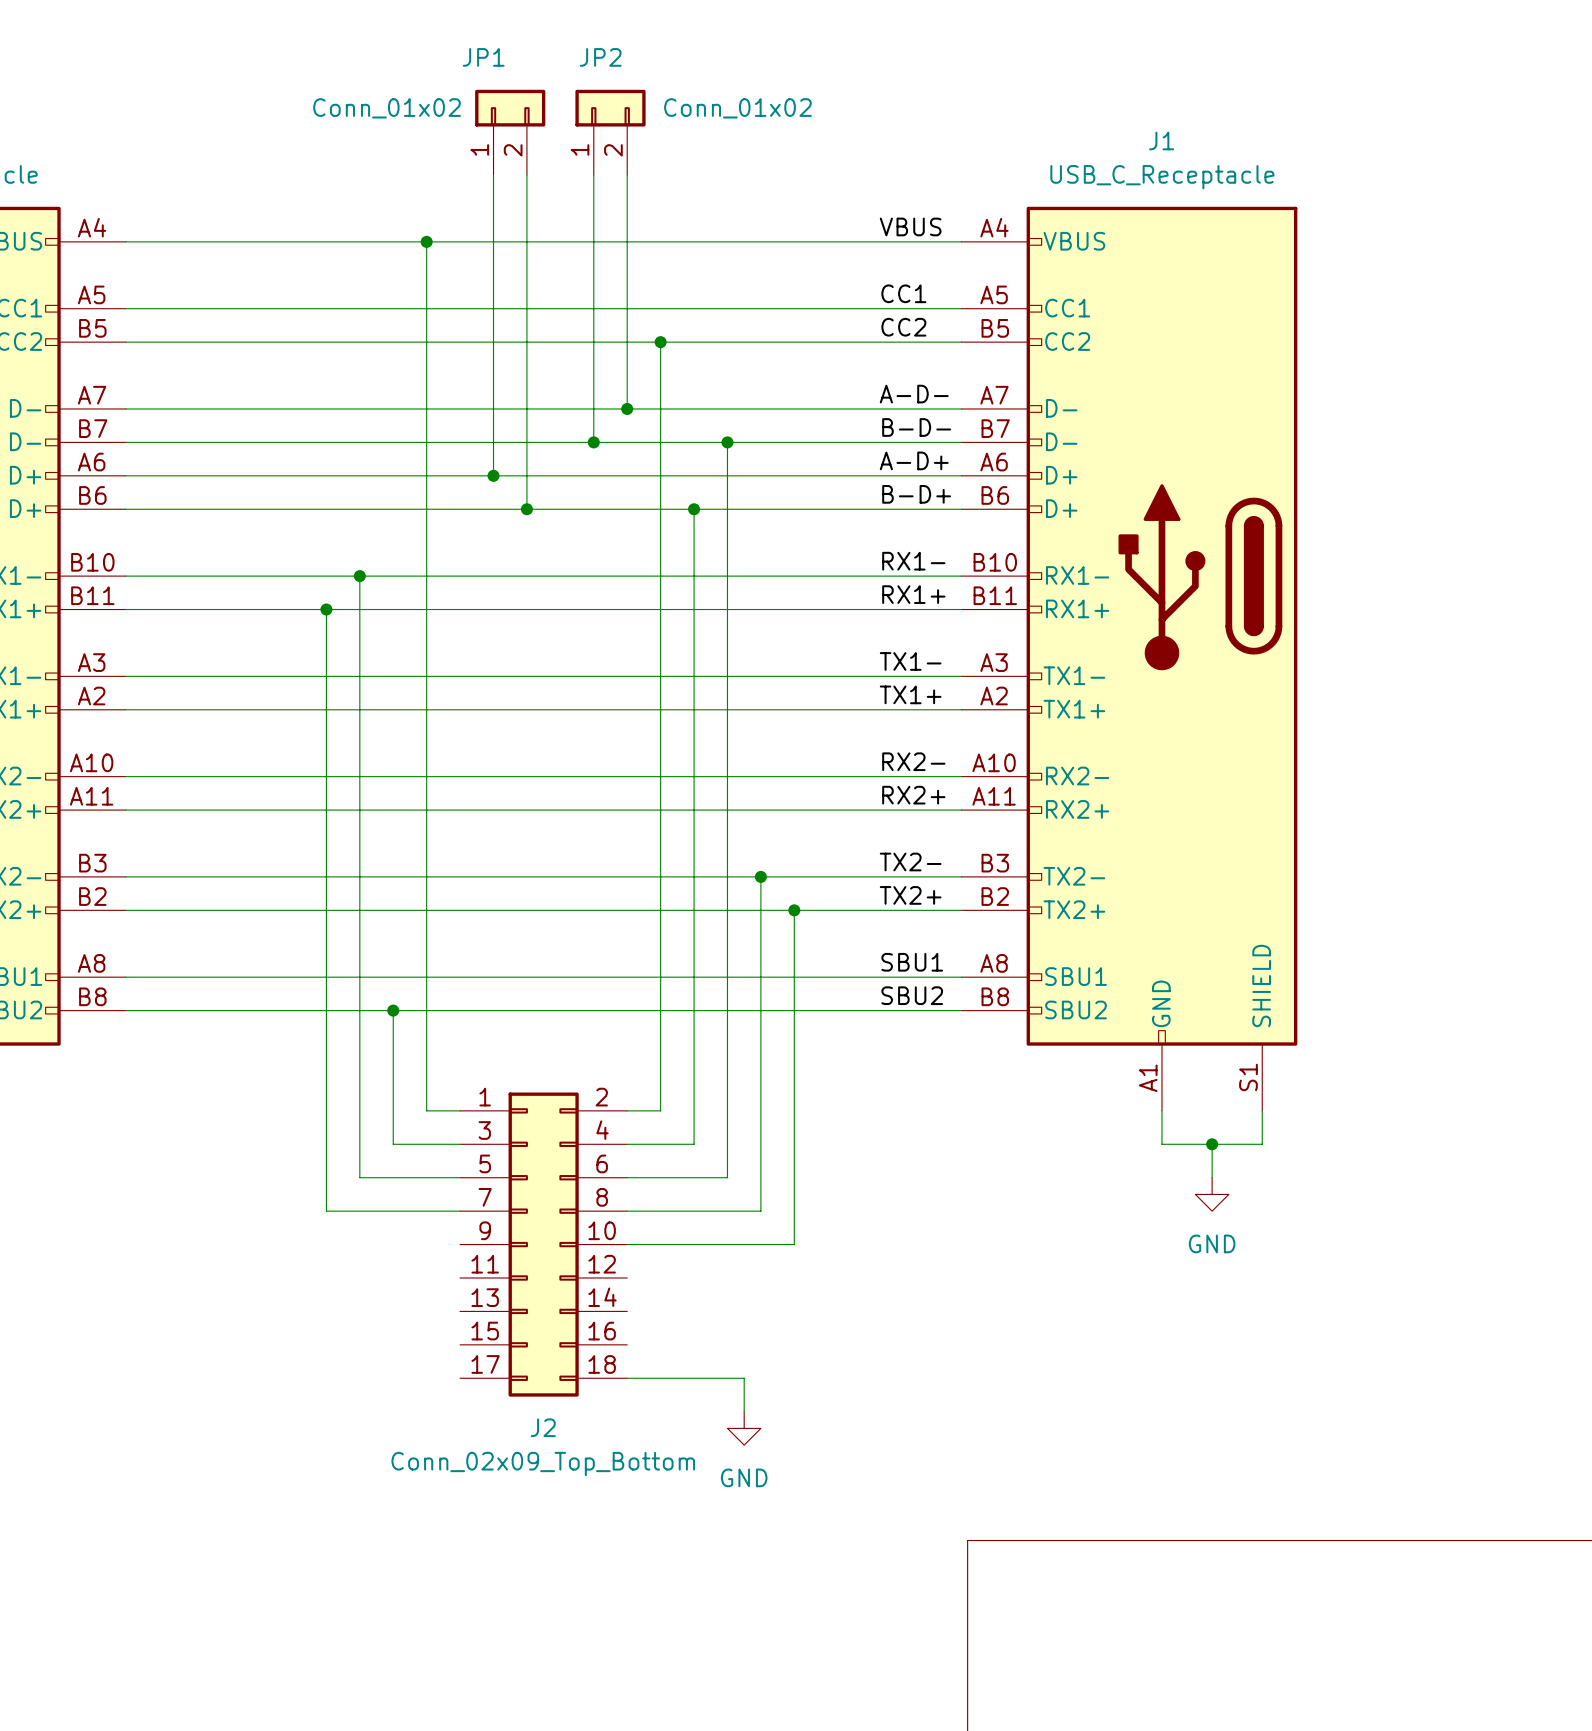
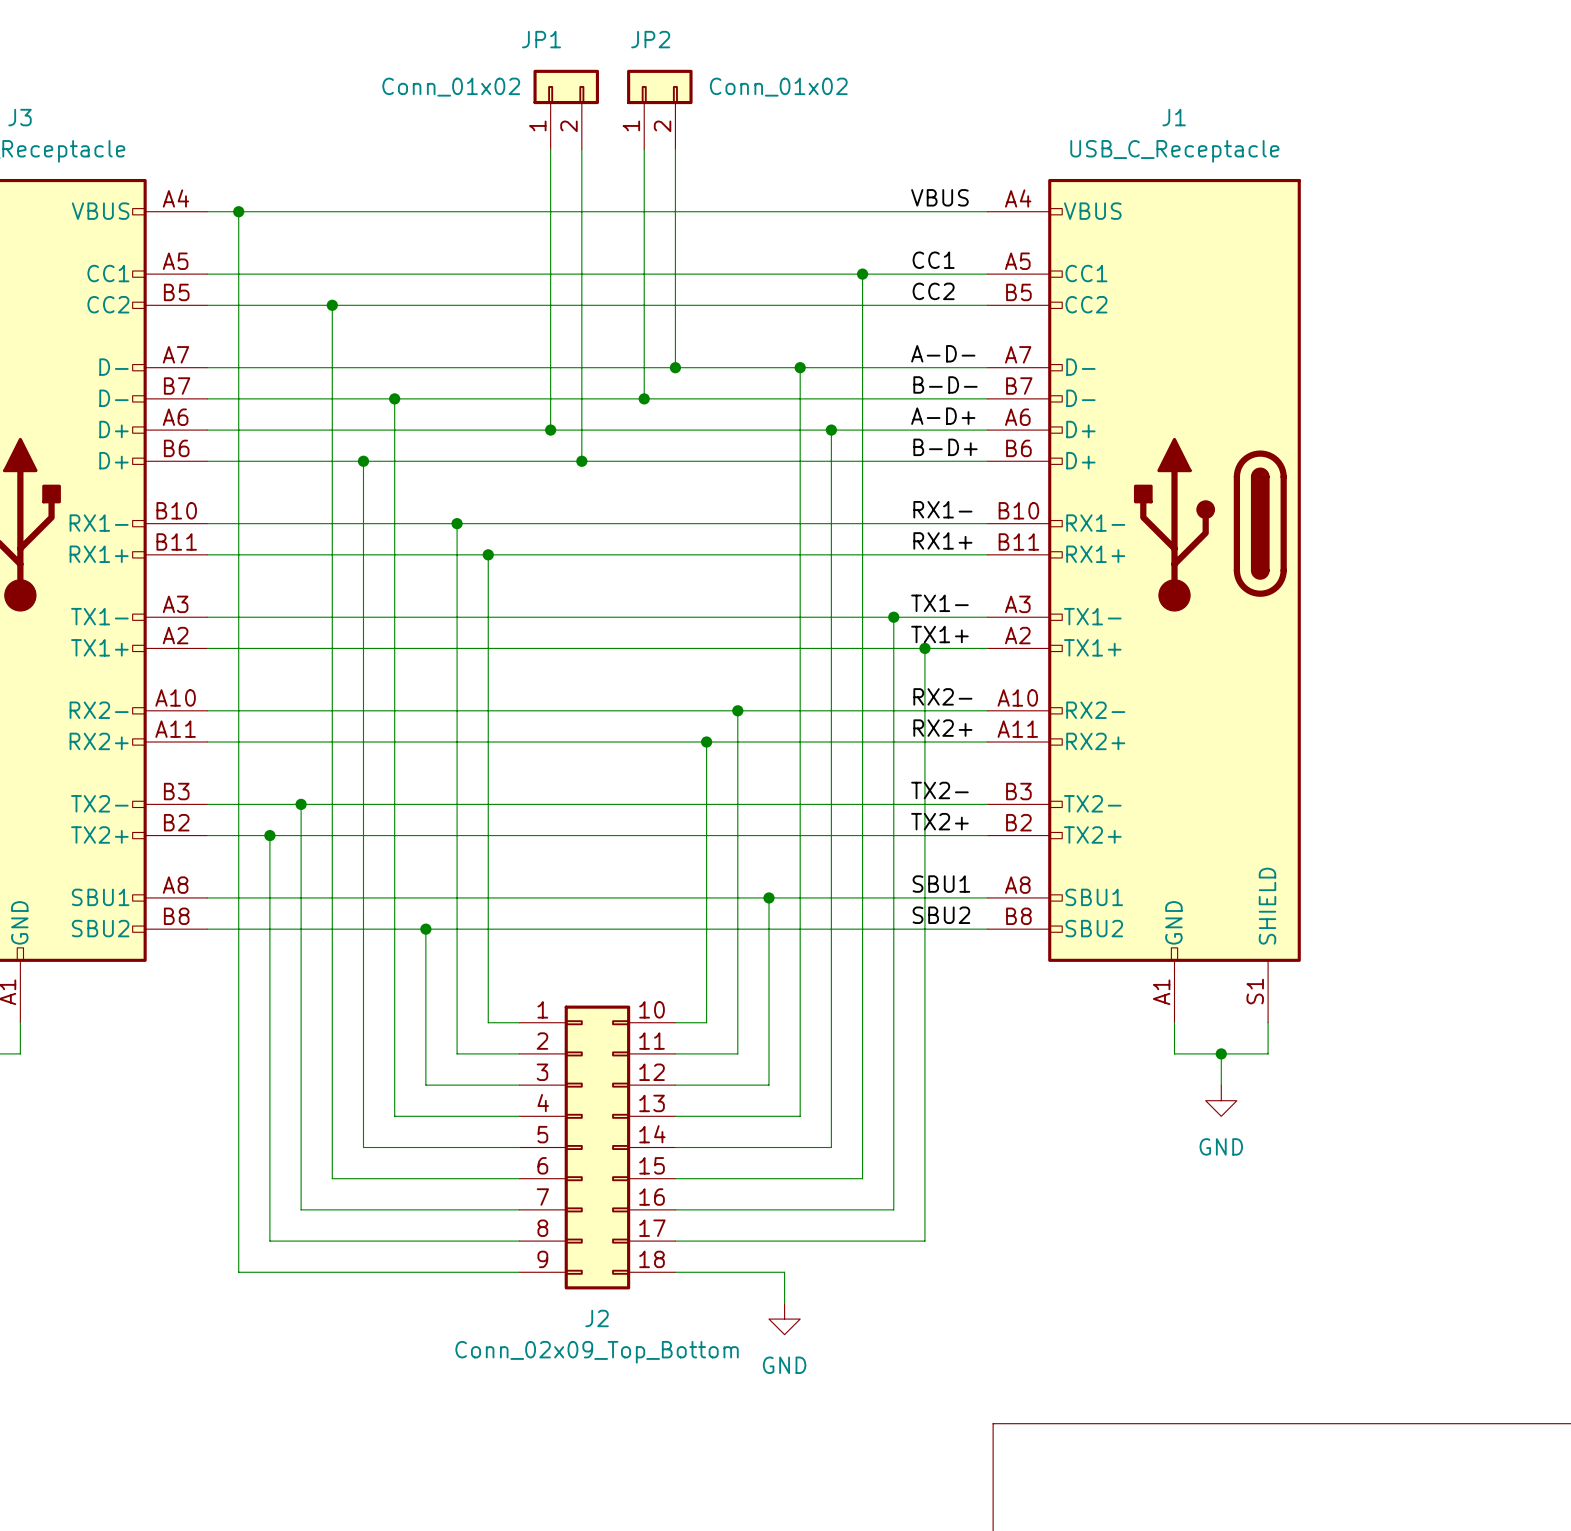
wire: none -> (238, 211) (238, 1272) (519, 1272)
junction: none -> (238, 211)
wire: (426, 241) (426, 609) -> none
junction: (426, 241) -> none
wire: none -> (862, 274) (862, 1178) (675, 1178)
junction: none -> (862, 274)
wire: none -> (332, 305) (332, 1178) (519, 1178)
junction: none -> (332, 305)
wire: (660, 342) (660, 810) -> (800, 367) (800, 804)
junction: (660, 342) -> none
junction: none -> (800, 367)
wire: none -> (394, 398) (394, 554)
junction: none -> (394, 398)
wire: (727, 442) (727, 977) -> none
junction: (727, 442) -> none
wire: none -> (831, 430) (831, 835)
junction: none -> (831, 430)
wire: none -> (363, 461) (363, 1147) (519, 1147)
junction: none -> (363, 461)
wire: (694, 509) (694, 776) -> none
junction: (694, 509) -> none
wire: (359, 576) (359, 1010) -> (457, 523) (457, 929)
junction position: (359, 576) -> (457, 523)
junction: (326, 609) -> none
junction: none -> (488, 554)
wire: none -> (893, 617) (893, 1209) (675, 1209)
junction: none -> (893, 617)
wire: none -> (924, 648) (924, 1241) (675, 1241)
junction: none -> (924, 648)
junction: none -> (737, 710)
junction: none -> (706, 742)
wire: none -> (301, 804) (301, 1209) (519, 1209)
junction: none -> (301, 804)
junction: (760, 876) -> none
wire: none -> (269, 835) (269, 1241) (519, 1241)
junction: none -> (269, 835)
junction: (794, 910) -> none
junction: none -> (768, 897)
junction position: (393, 1010) -> (425, 929)
J2 symbol: [460, 1092, 628, 1397] -> [519, 1005, 676, 1290]

